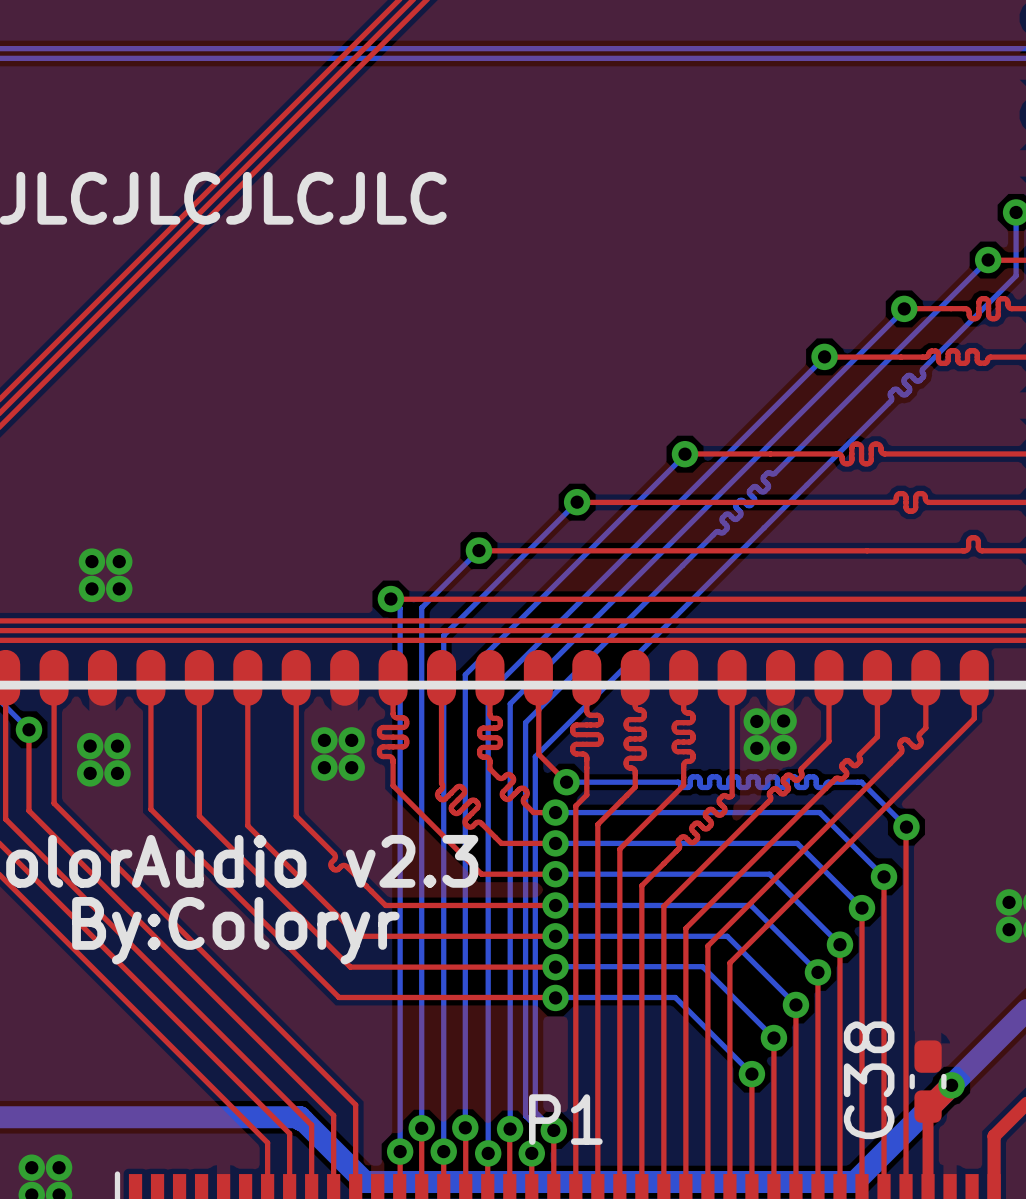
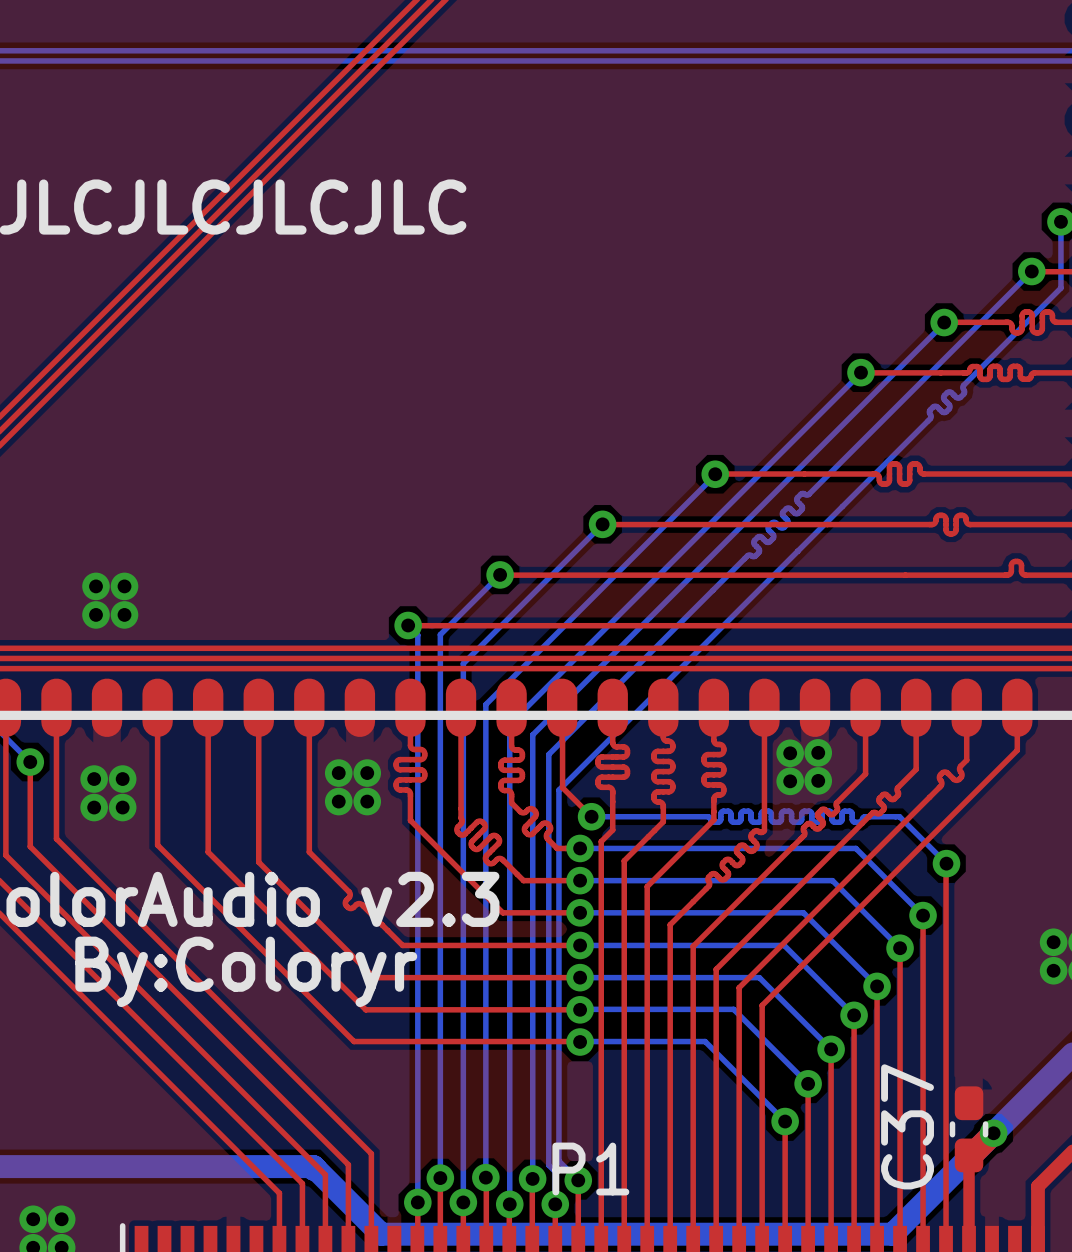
C38 name: C38 (869, 1080) -> C37 (907, 1126)

